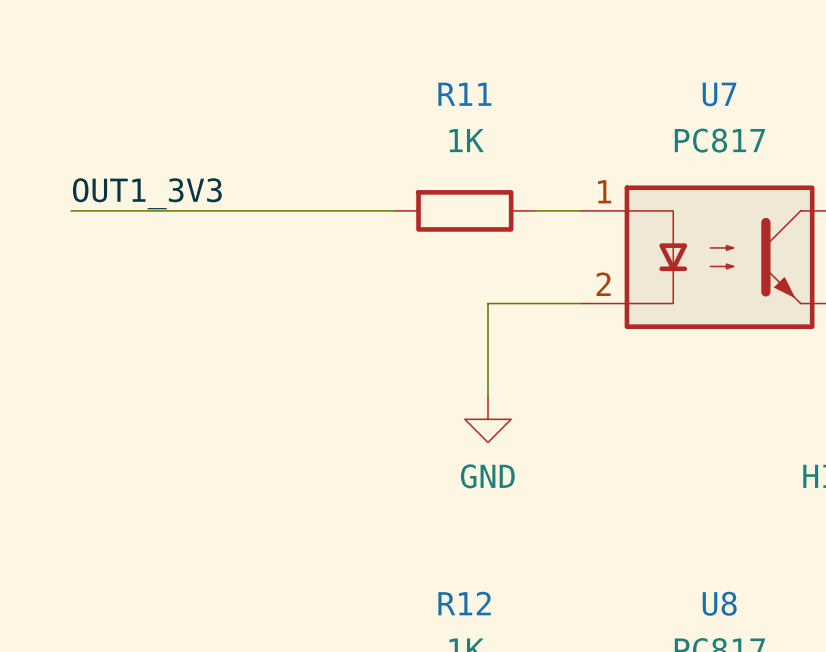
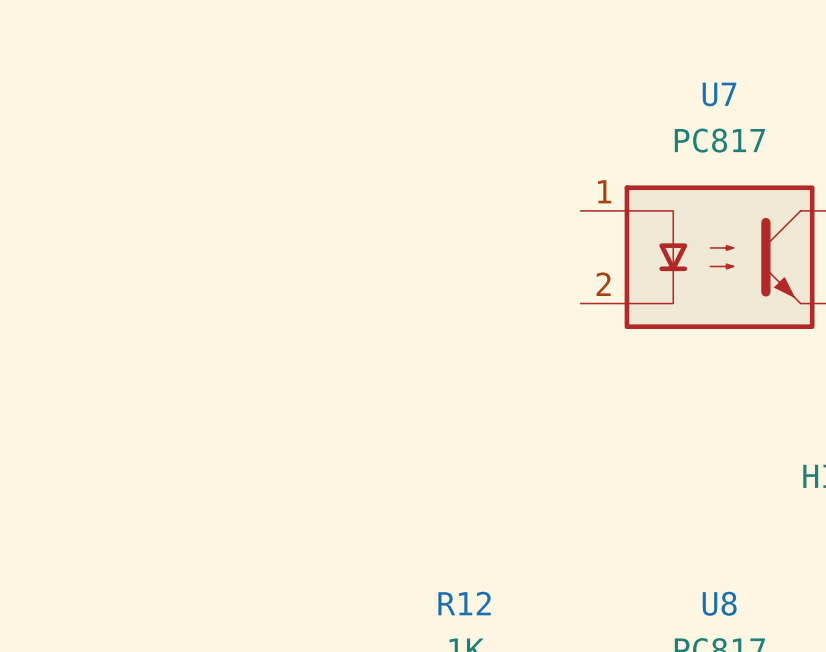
label: OUT1_3V3 (147, 193) -> none
wire: (71, 210) (395, 210) -> none
R11: 1K (464, 210) -> none
wire: (534, 210) (580, 210) -> none
wire: (580, 303) (487, 303) (487, 396) -> none
power symbol: GND (487, 419) -> none

